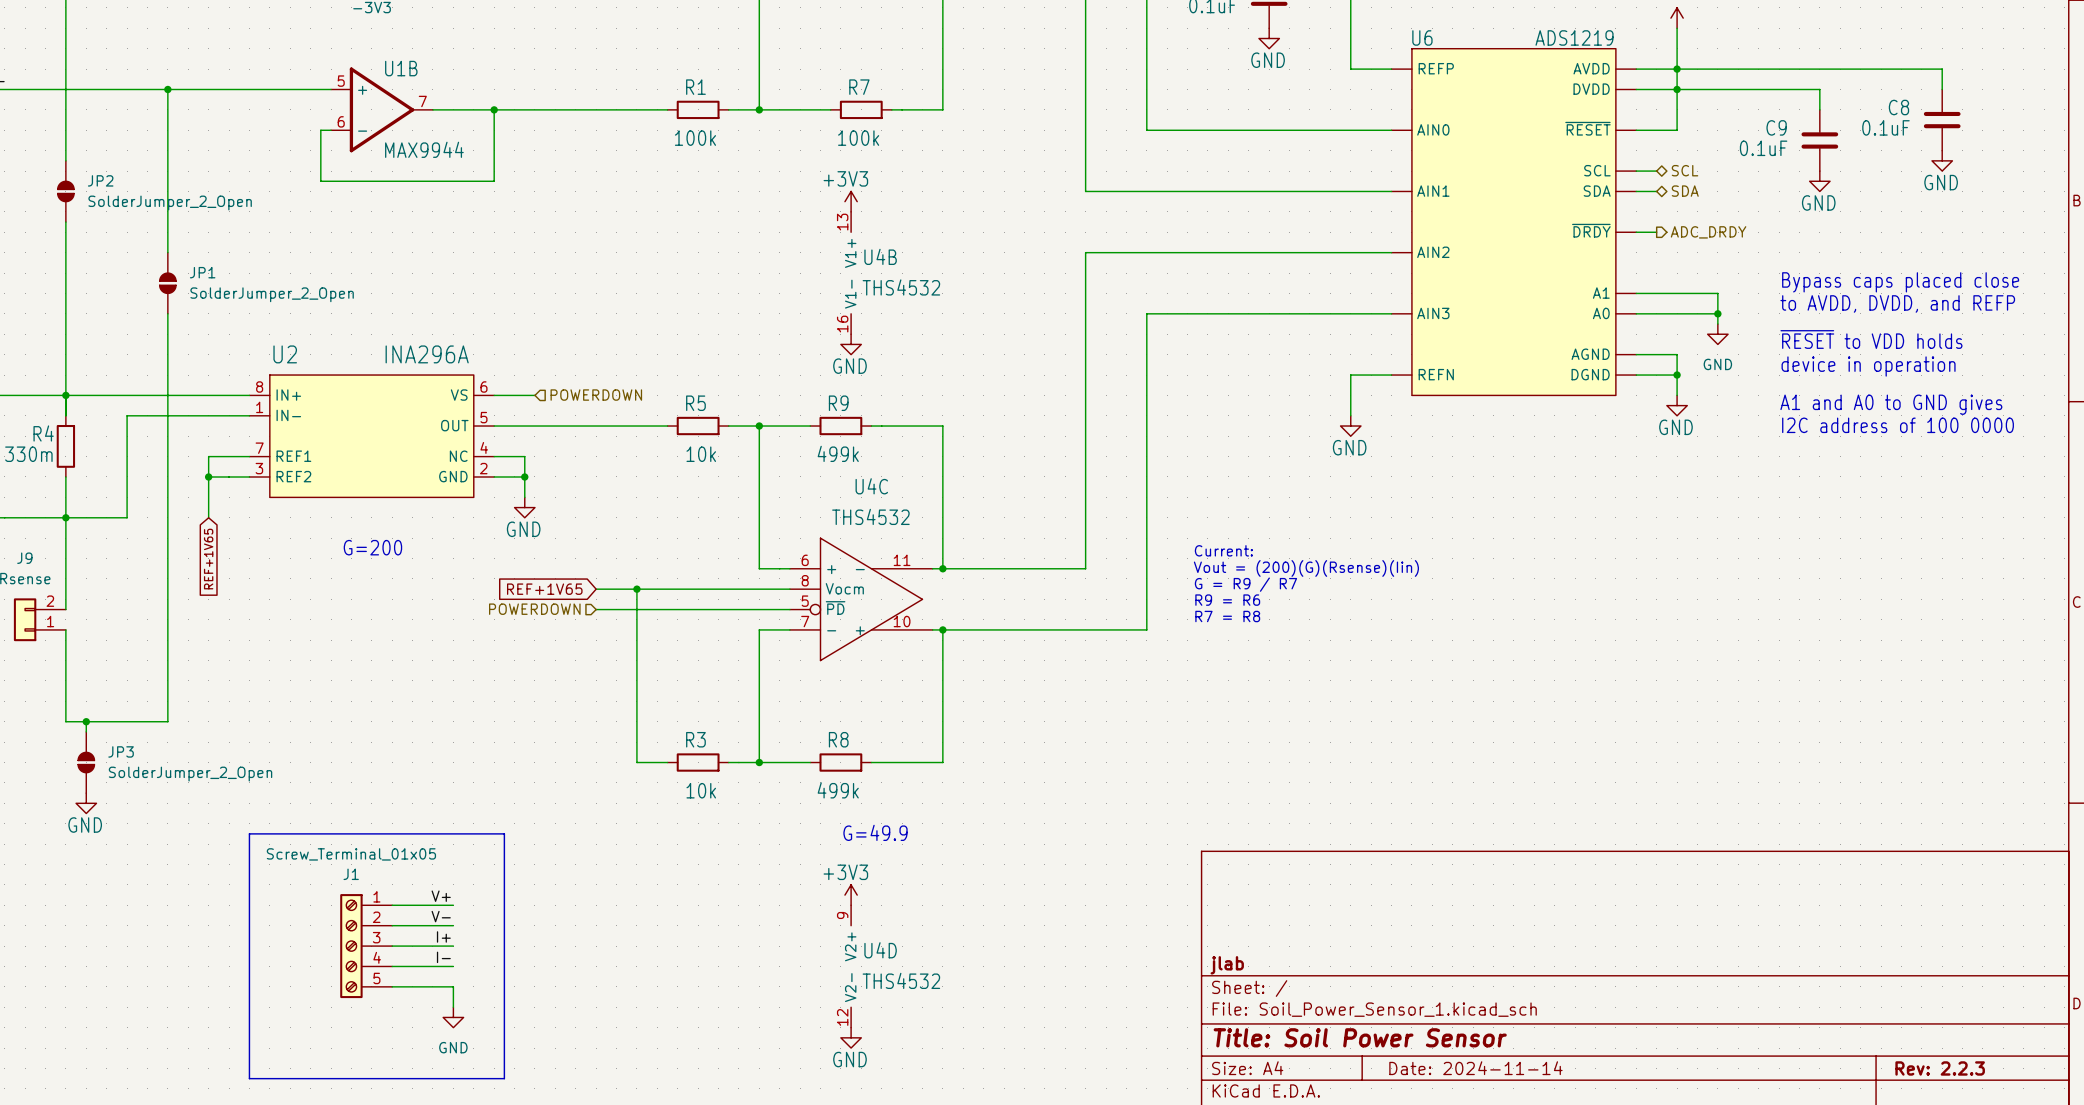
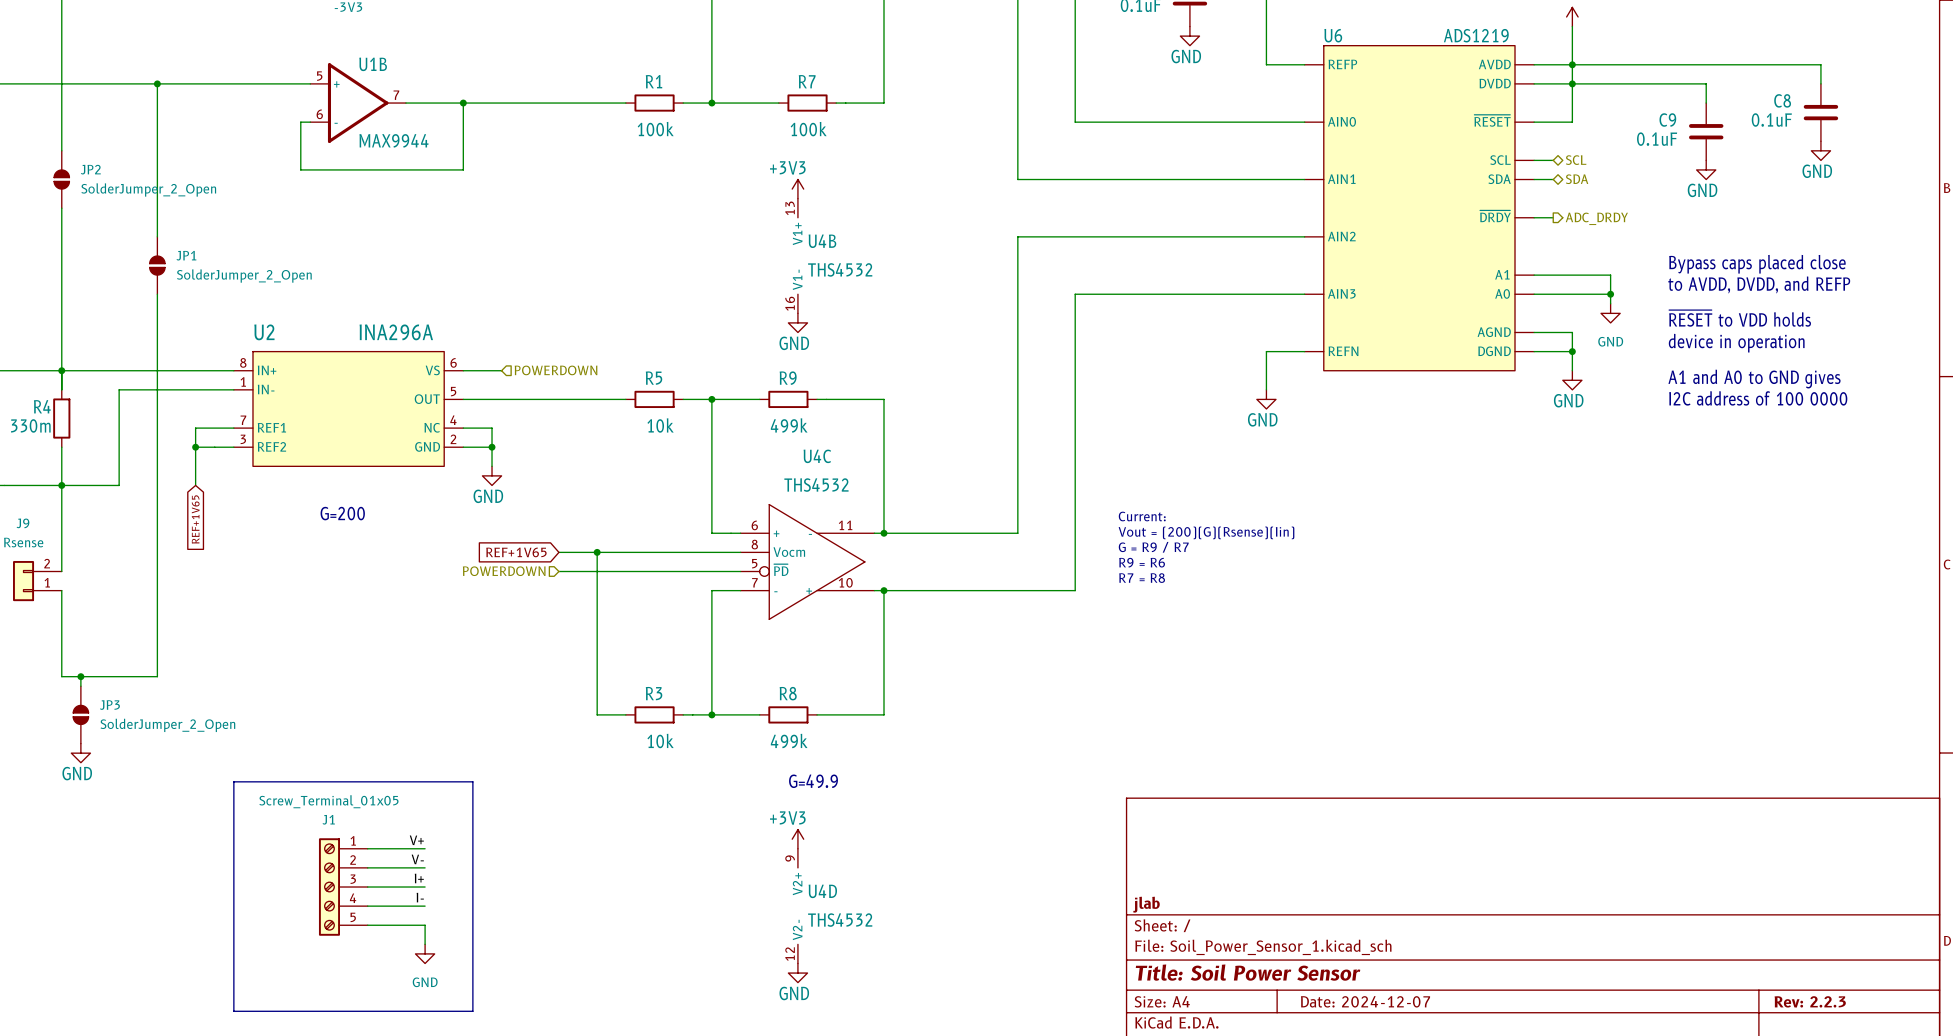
title block: Date: 2024-11-14 (1475, 1068) -> Date: 2024-12-07 (1365, 1001)

